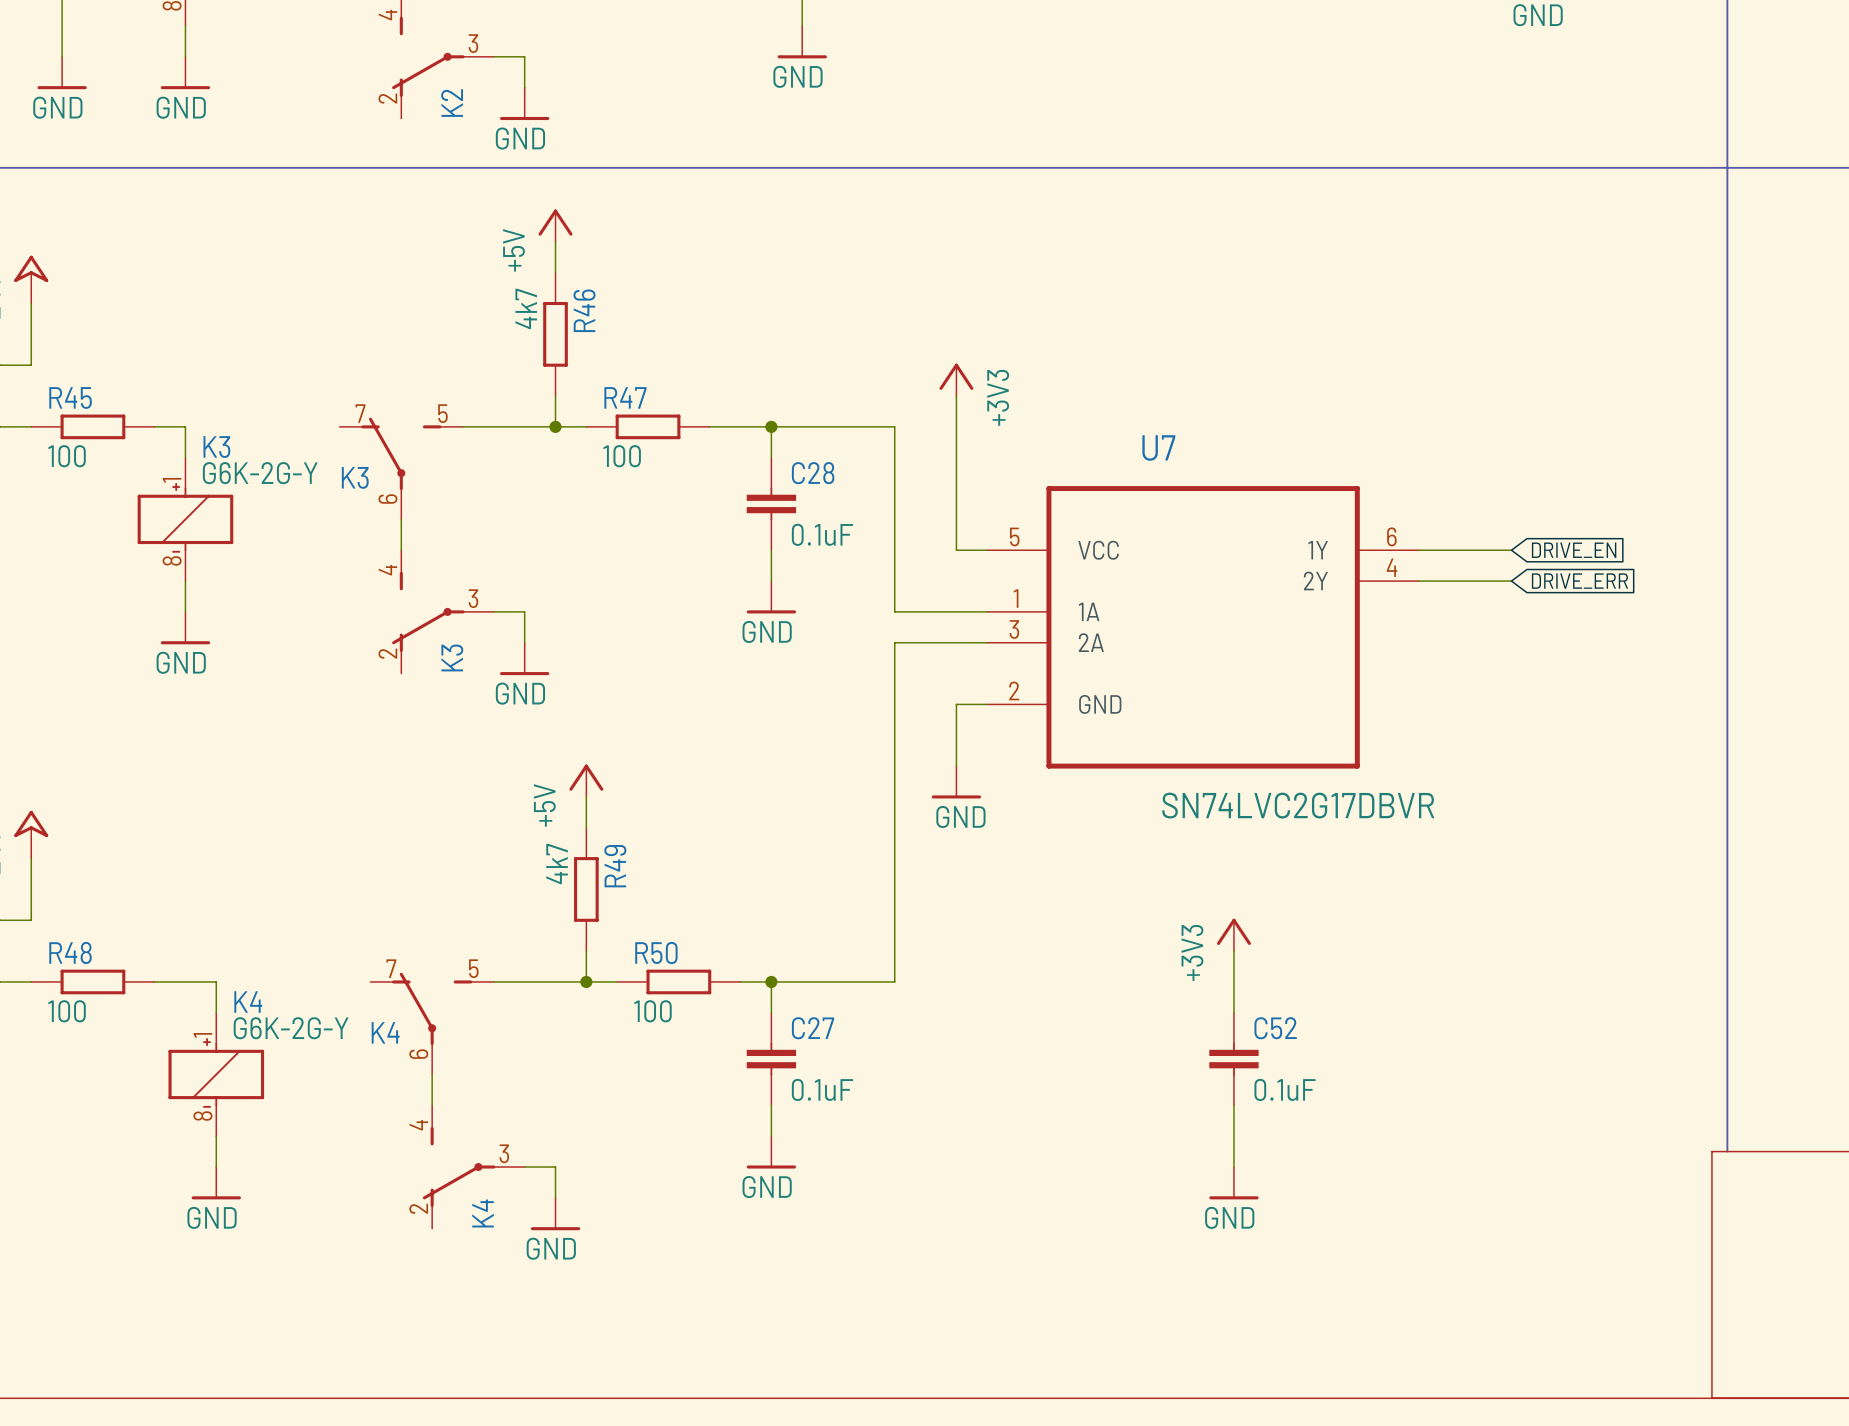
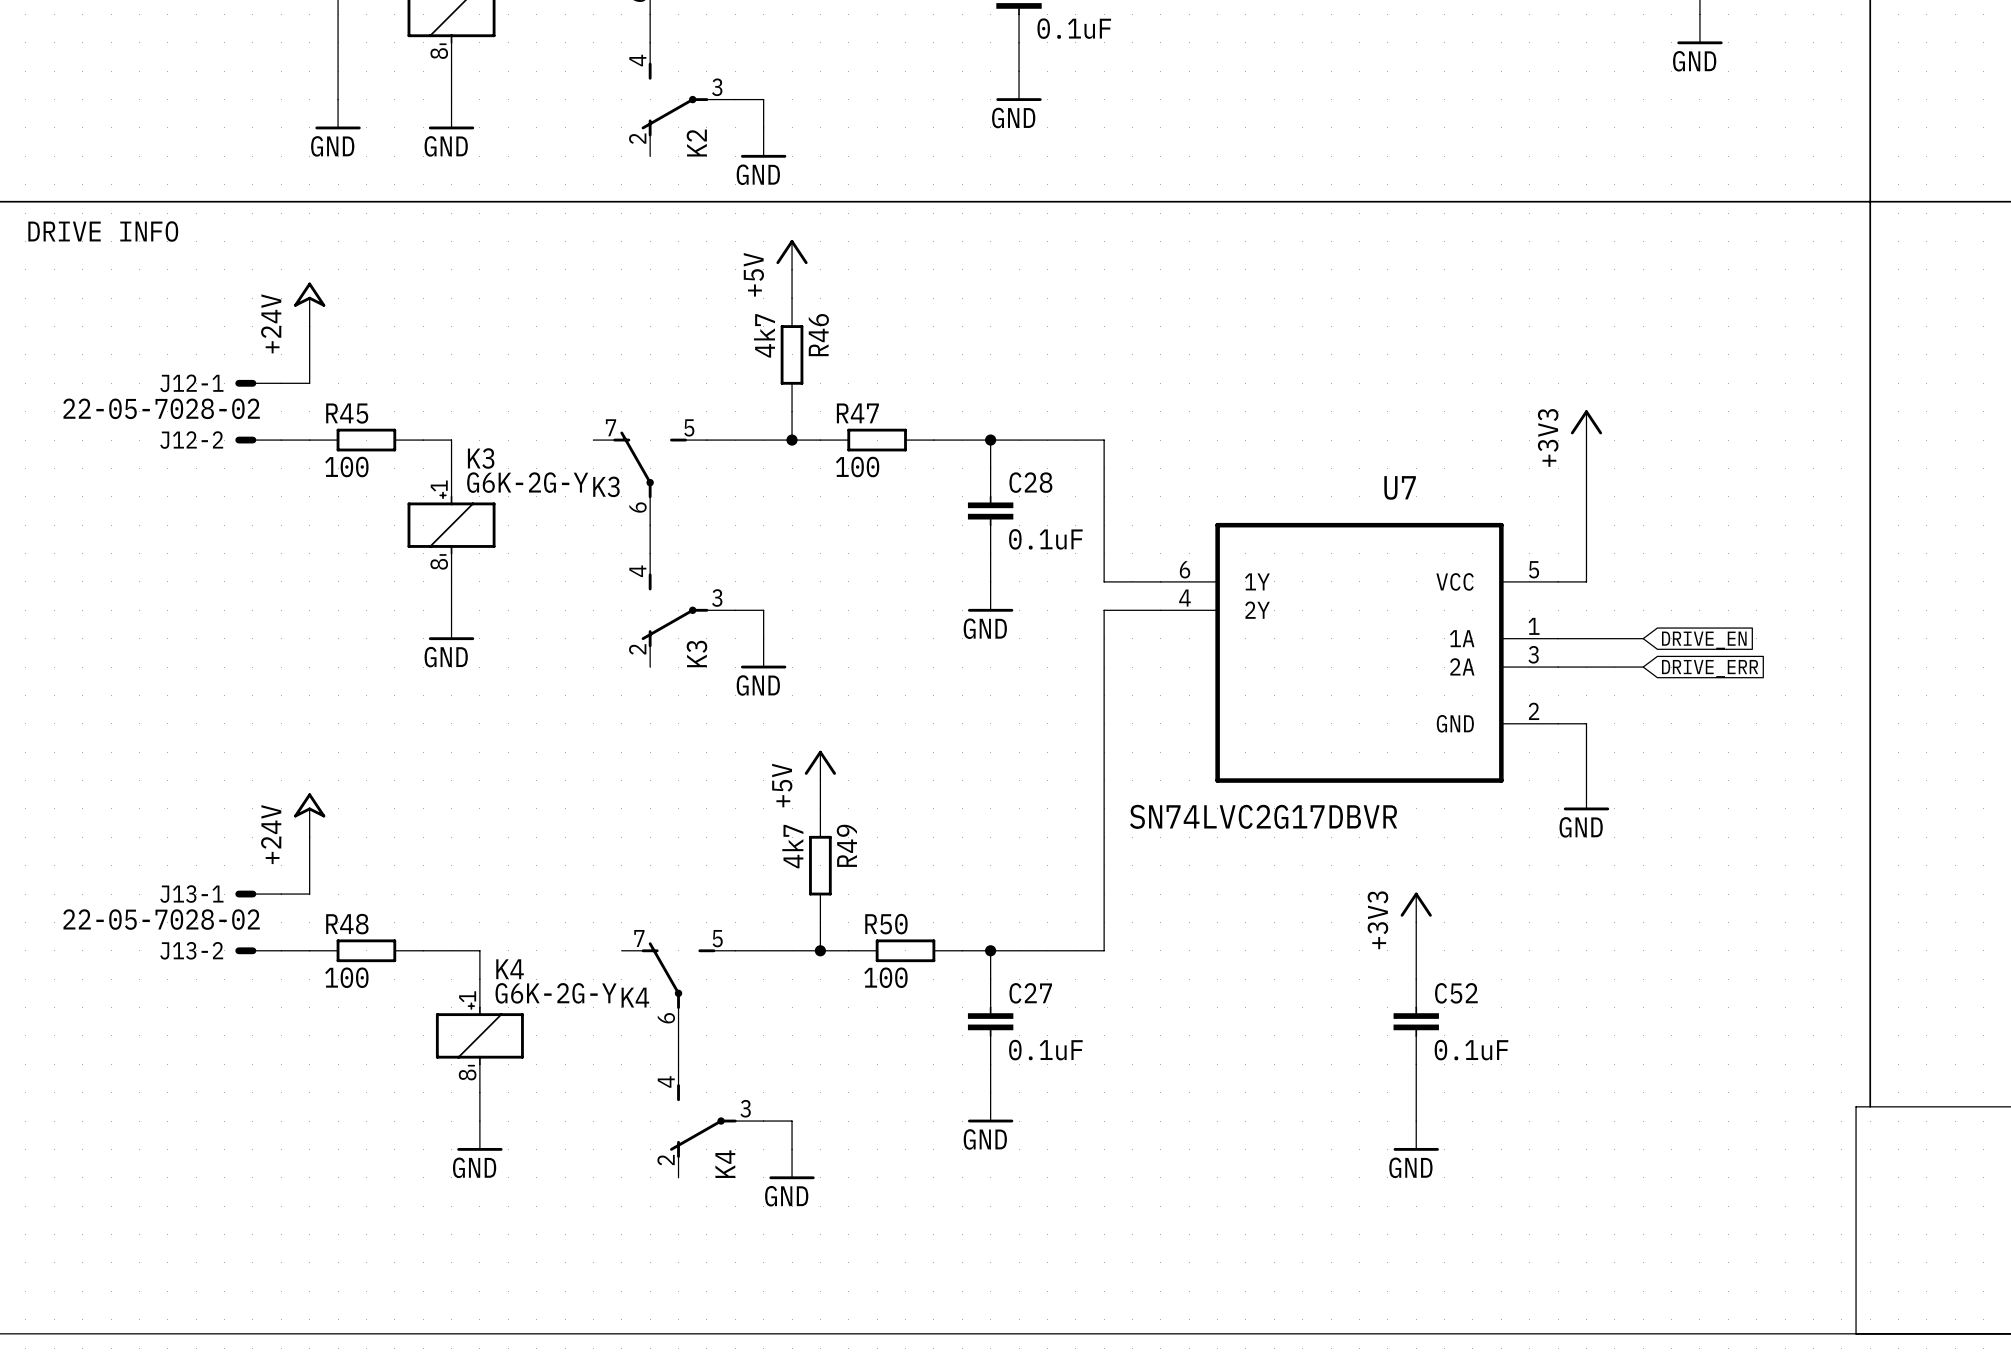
power symbol: +3V3 (956, 379) -> none
wire: (956, 396) (956, 550) (987, 550) -> none
power symbol: none -> +3V3 (1586, 425)
wire: none -> (1586, 440) (1586, 581) (1558, 581)
wire: (1418, 550) (1511, 550) -> (1558, 638) (1643, 638)
global label position: DRIVE_EN (1574, 550) -> DRIVE_EN (1704, 640)
wire: (894, 581) (894, 611) -> (1104, 638) (1104, 610)
wire: none -> (1104, 581) (1160, 581)
wire: (1418, 581) (1511, 581) -> (1558, 667) (1643, 667)
global label position: DRIVE_ERR (1579, 581) -> DRIVE_ERR (1710, 668)
U7 flip: as is (1203, 627) -> left-right (1359, 652)
wire: (894, 642) (987, 642) -> none
wire: (987, 704) (956, 704) (956, 766) -> none
wire: none -> (1558, 723) (1586, 723) (1586, 780)
power symbol: GND (956, 782) -> none
power symbol: none -> GND (1586, 795)

